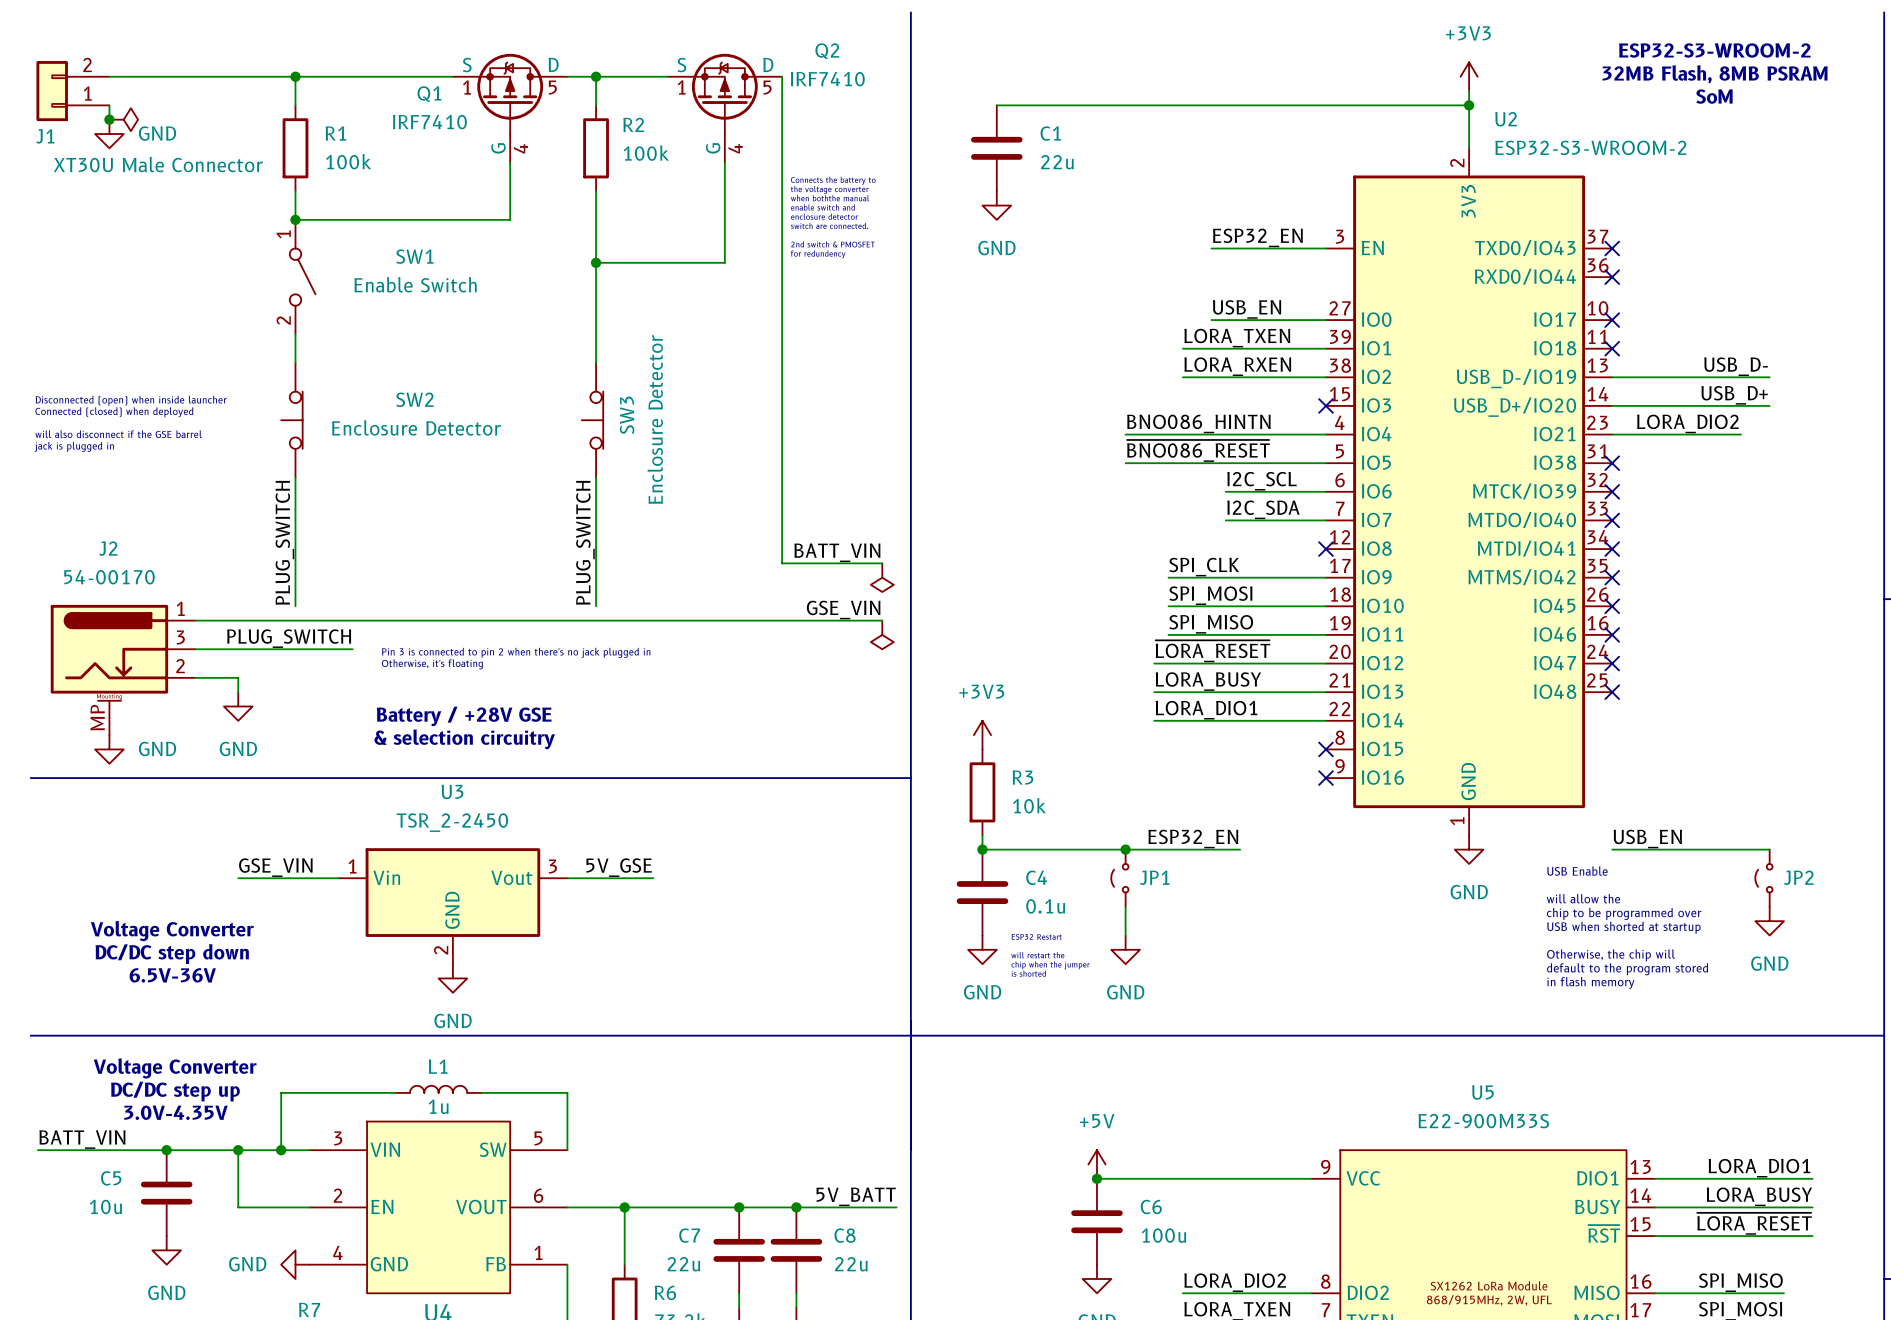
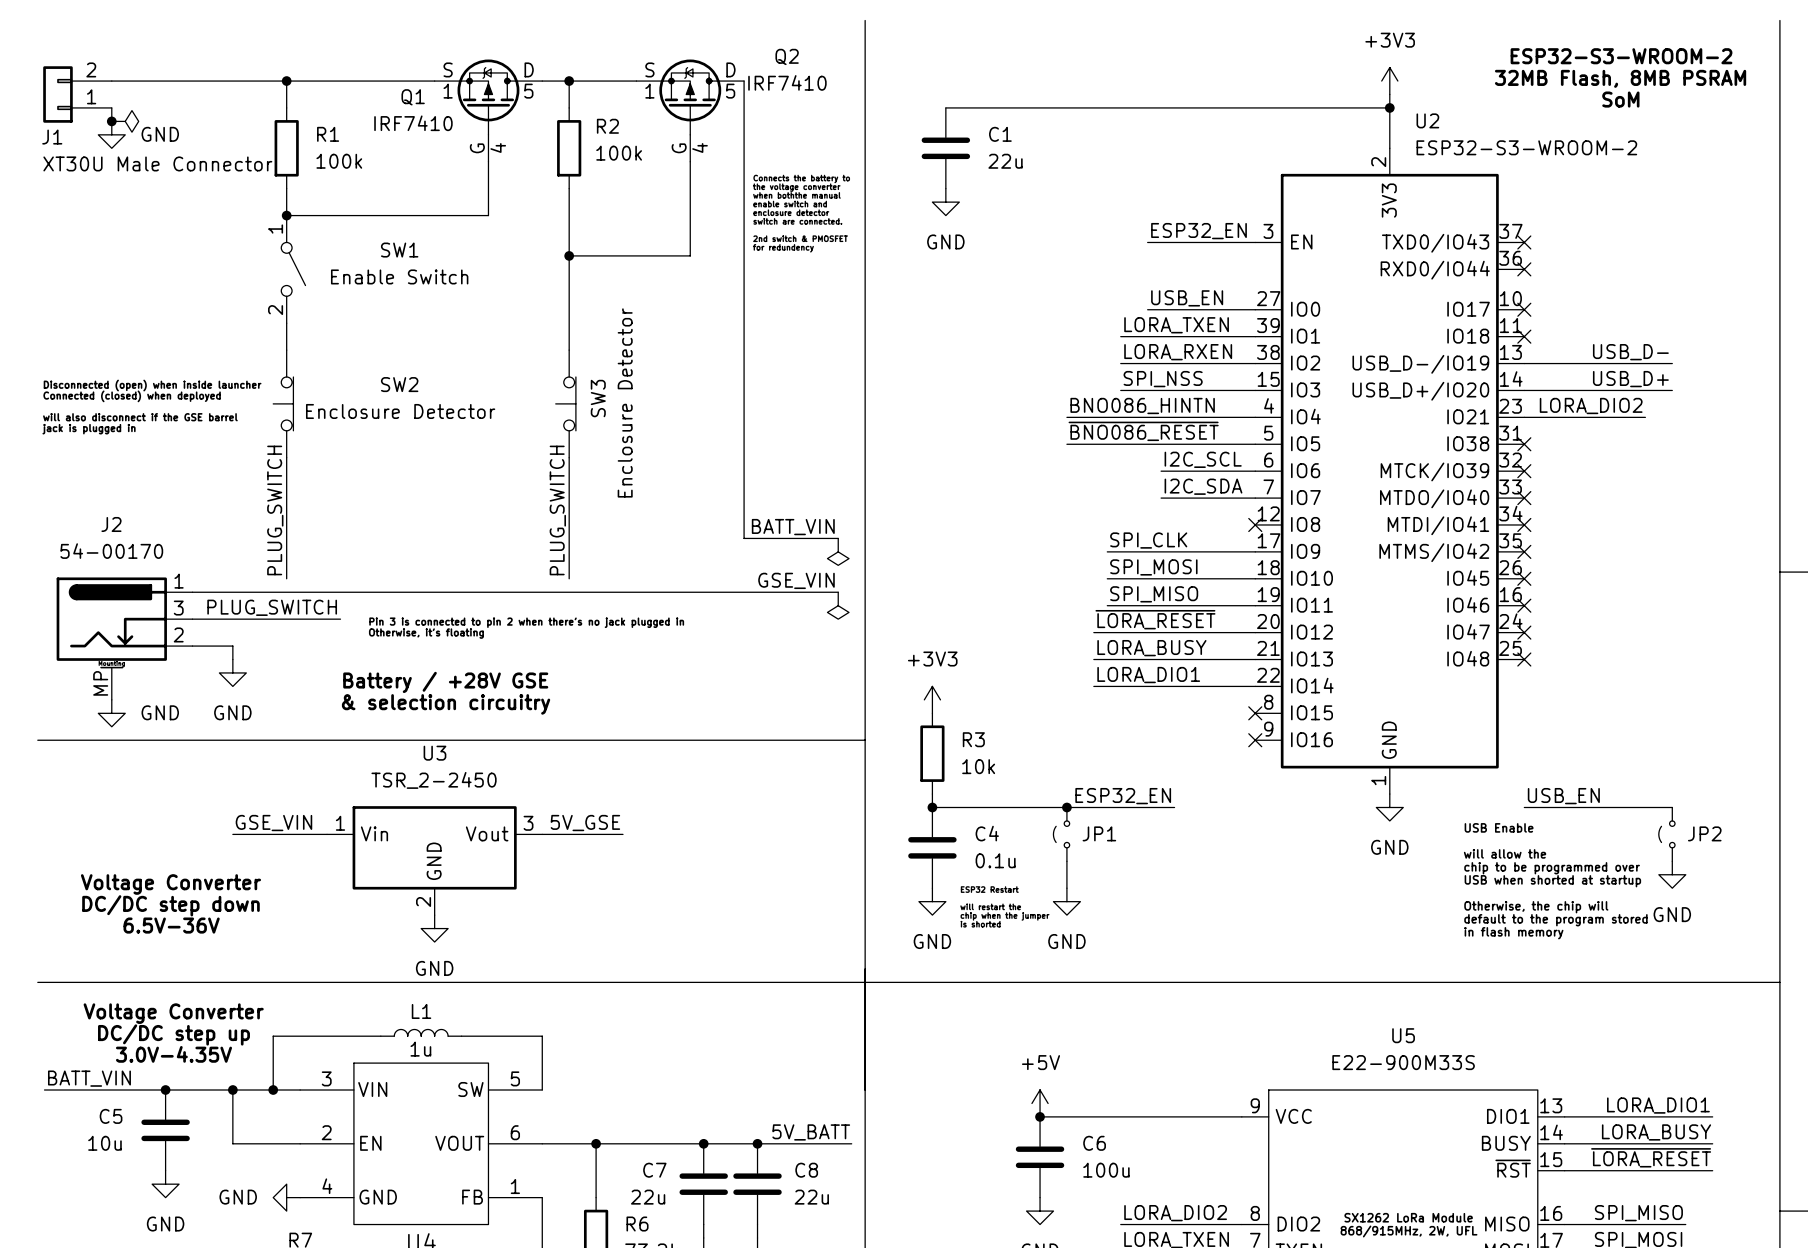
label: none -> SPI_NSS (1163, 379)
wire: none -> (1120, 390) (1255, 390)
no-connect mark: (1325, 405) -> none

